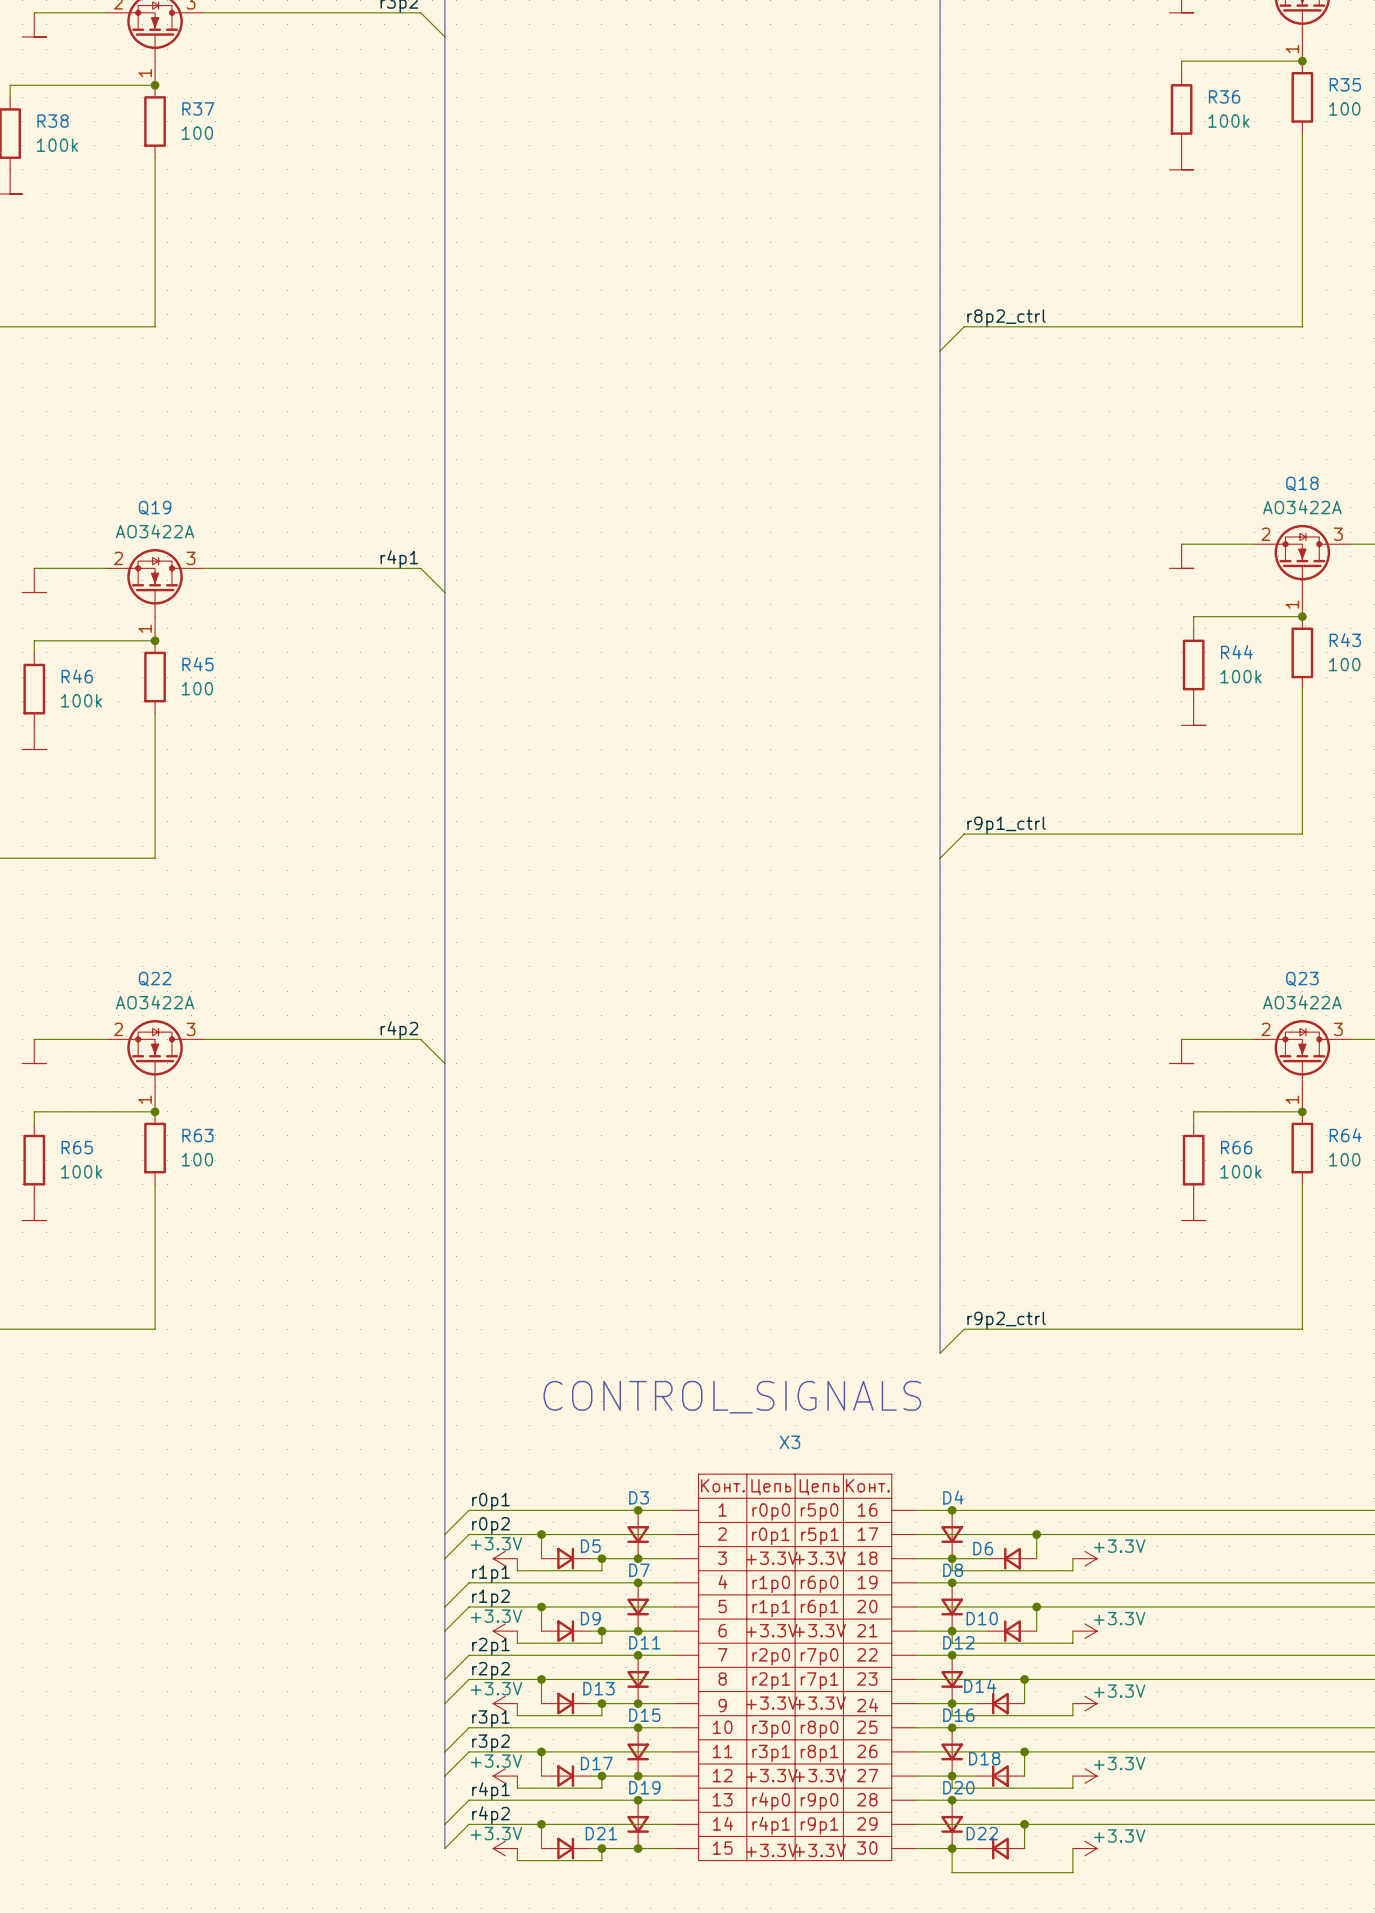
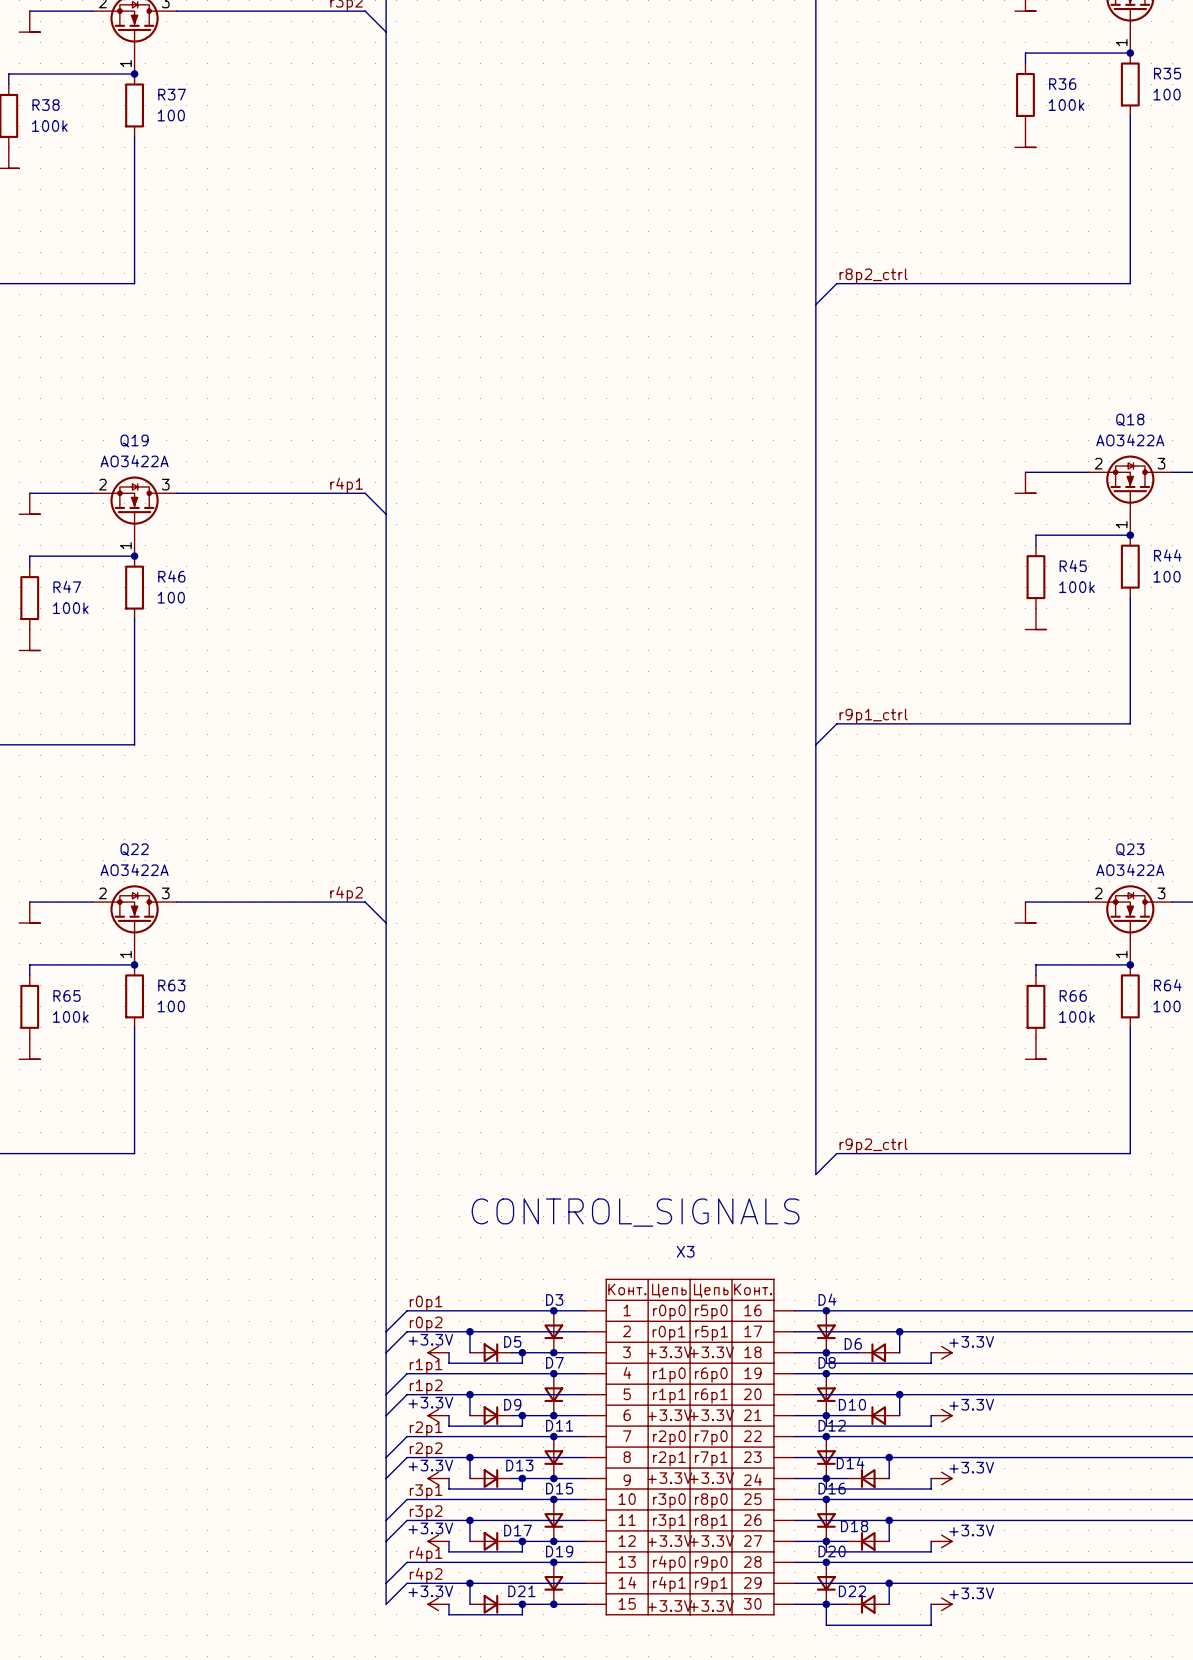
R43 name: R43 (1345, 640) -> R44 (1167, 555)
R44 name: R44 (1236, 652) -> R45 (1073, 565)
R45 name: R45 (197, 664) -> R46 (171, 576)
R46 name: R46 (77, 676) -> R47 (67, 586)

